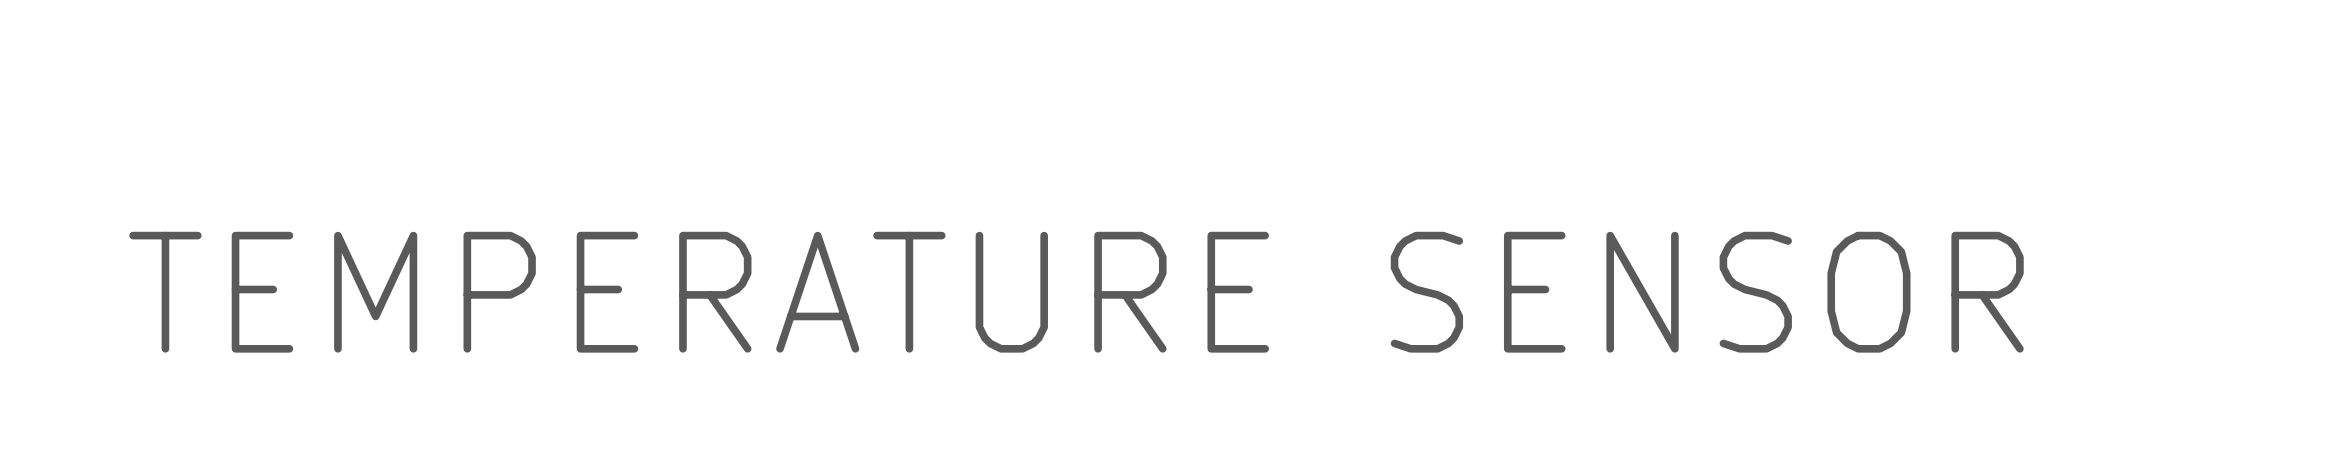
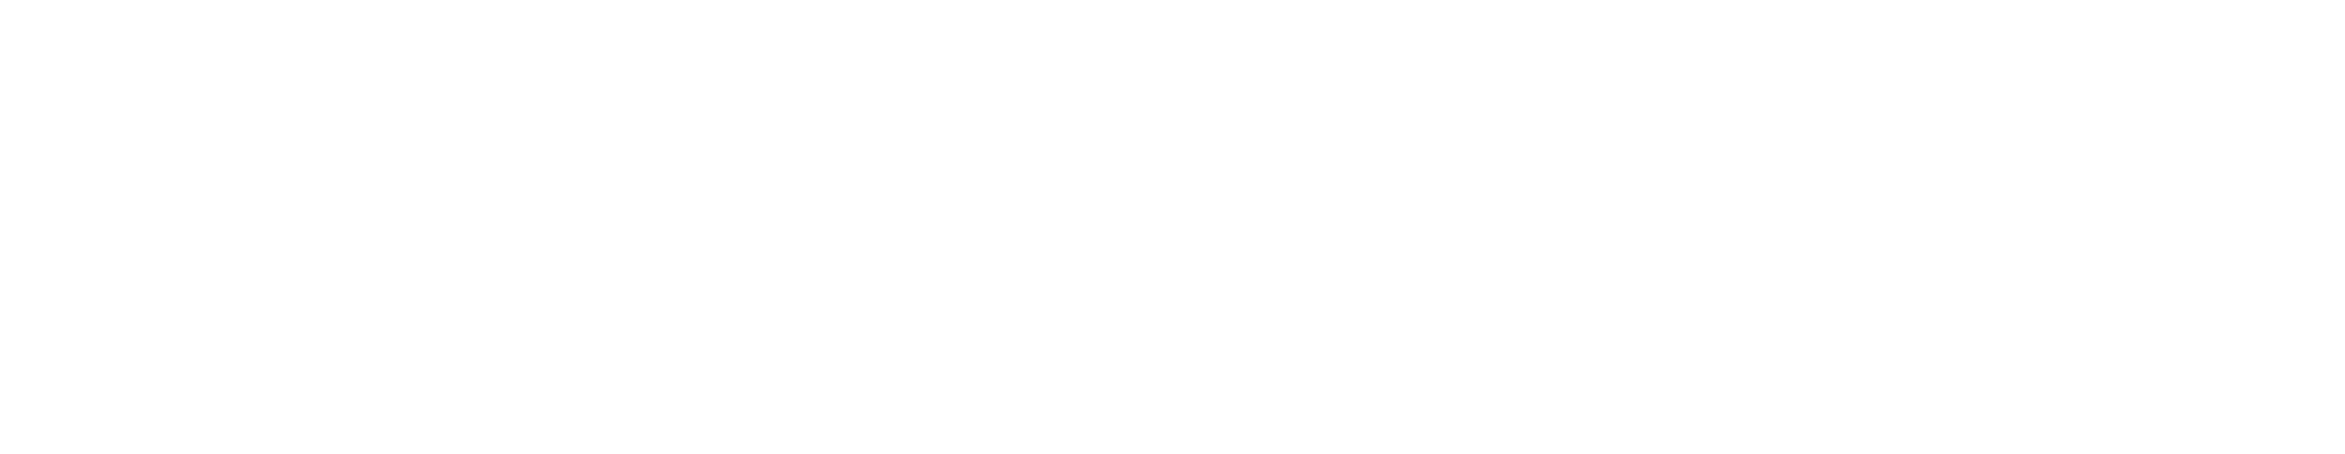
text: TEMPERATURE SENSOR (1076, 292) -> none

